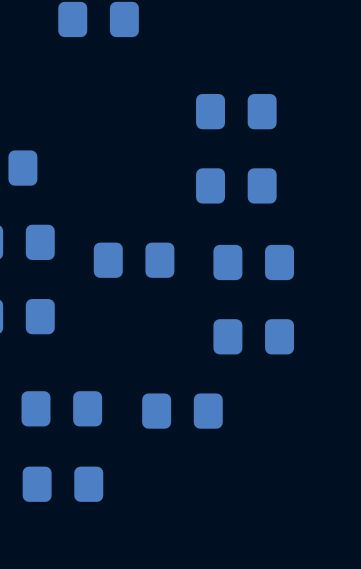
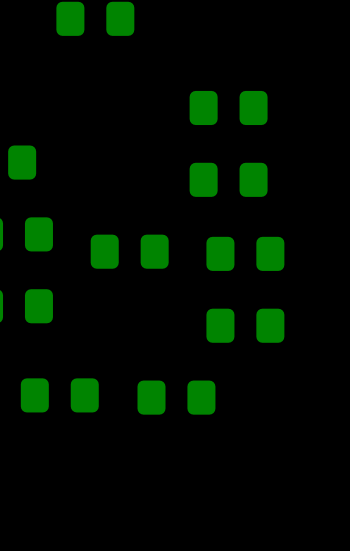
part: (62, 484) -> none

